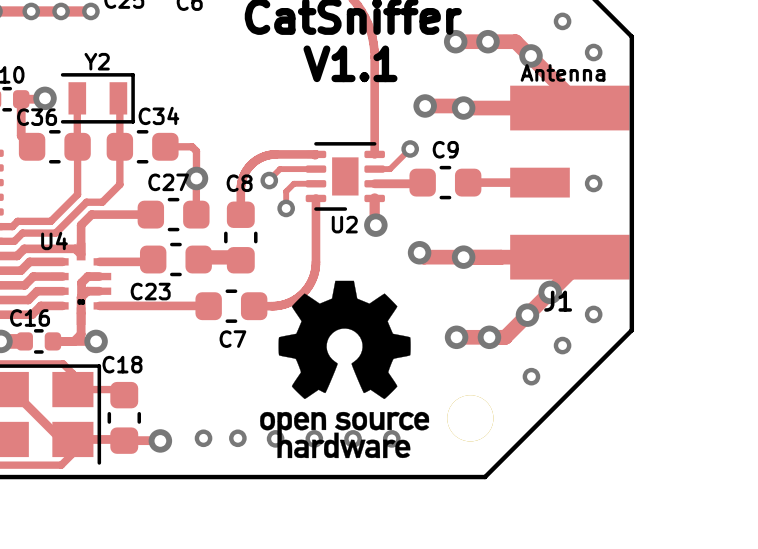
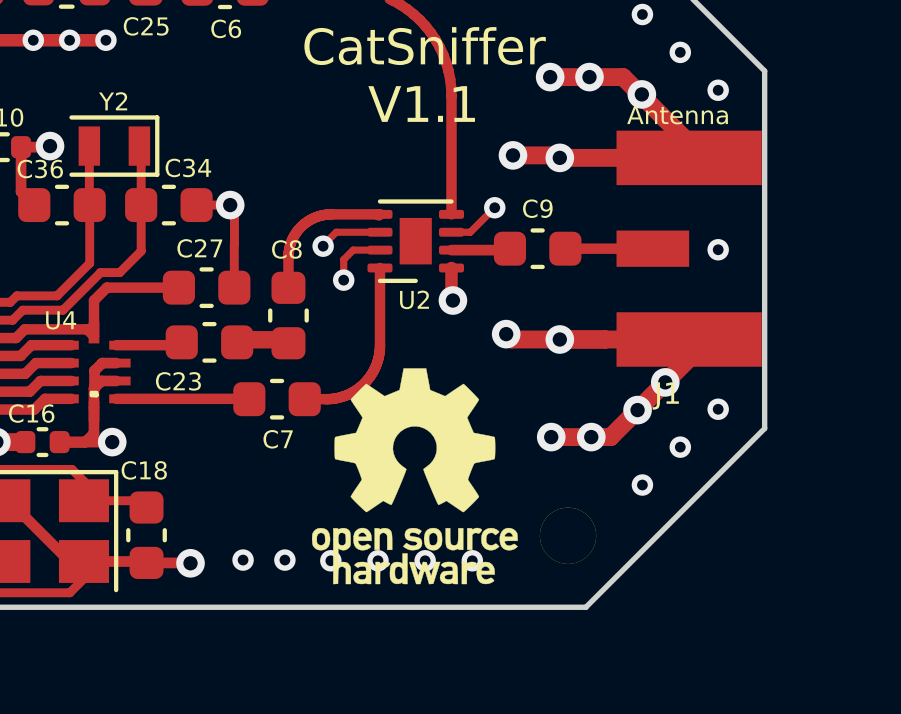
via position: (196, 178) -> (230, 205)

